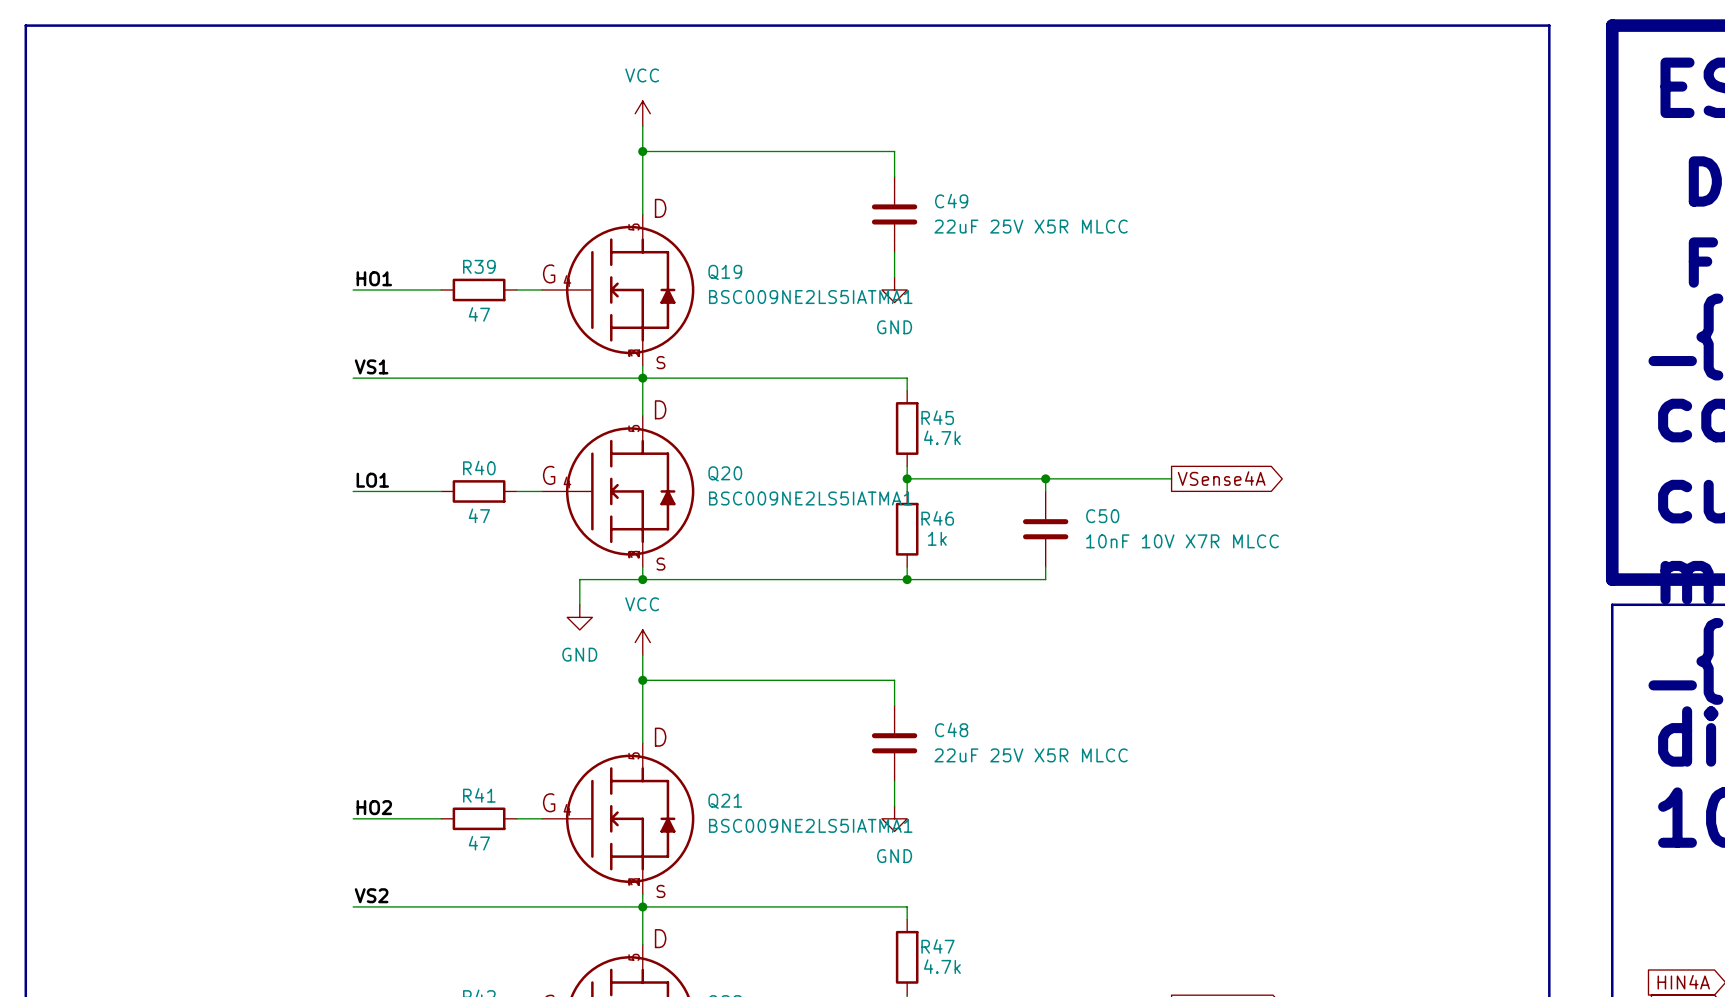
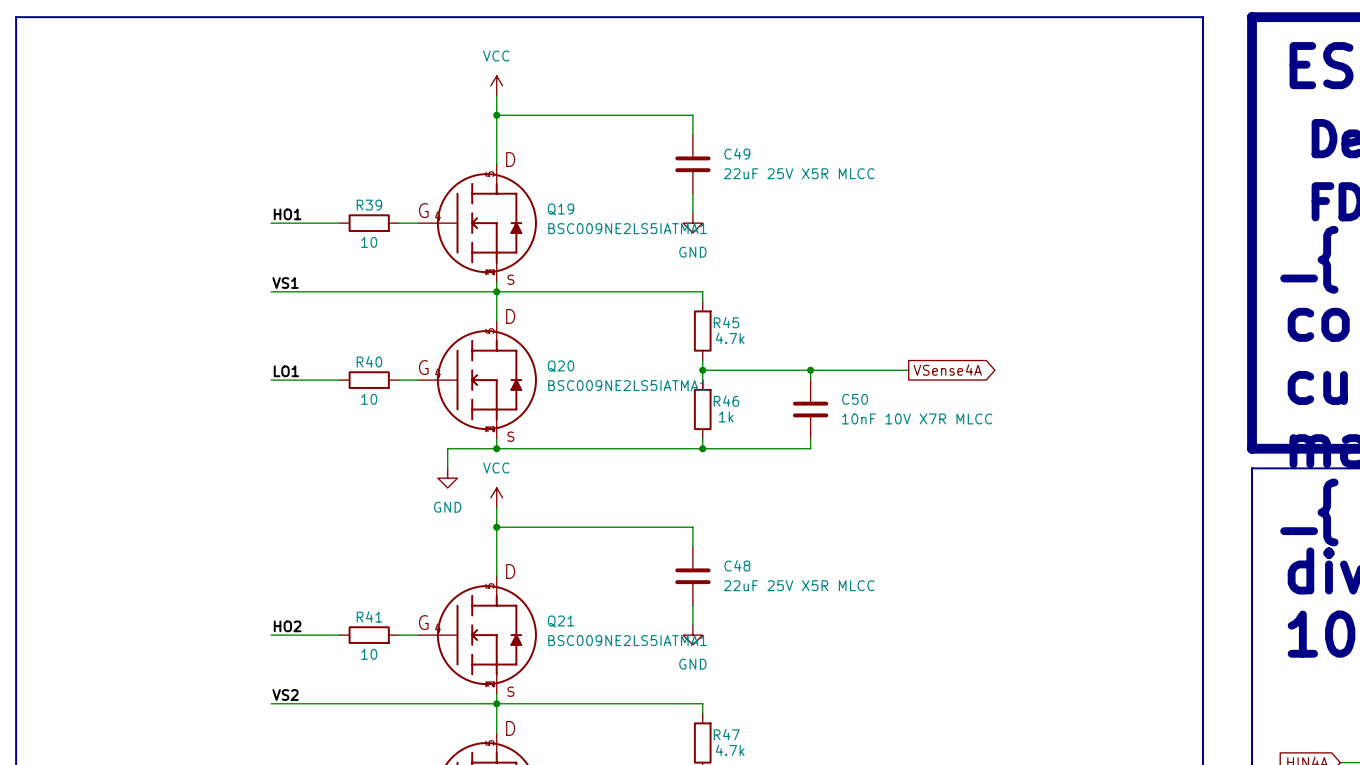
R39 value: 47 (479, 314) -> 10 (369, 242)
R40 value: 47 (479, 515) -> 10 (369, 399)
R41 value: 47 (479, 843) -> 10 (369, 654)

